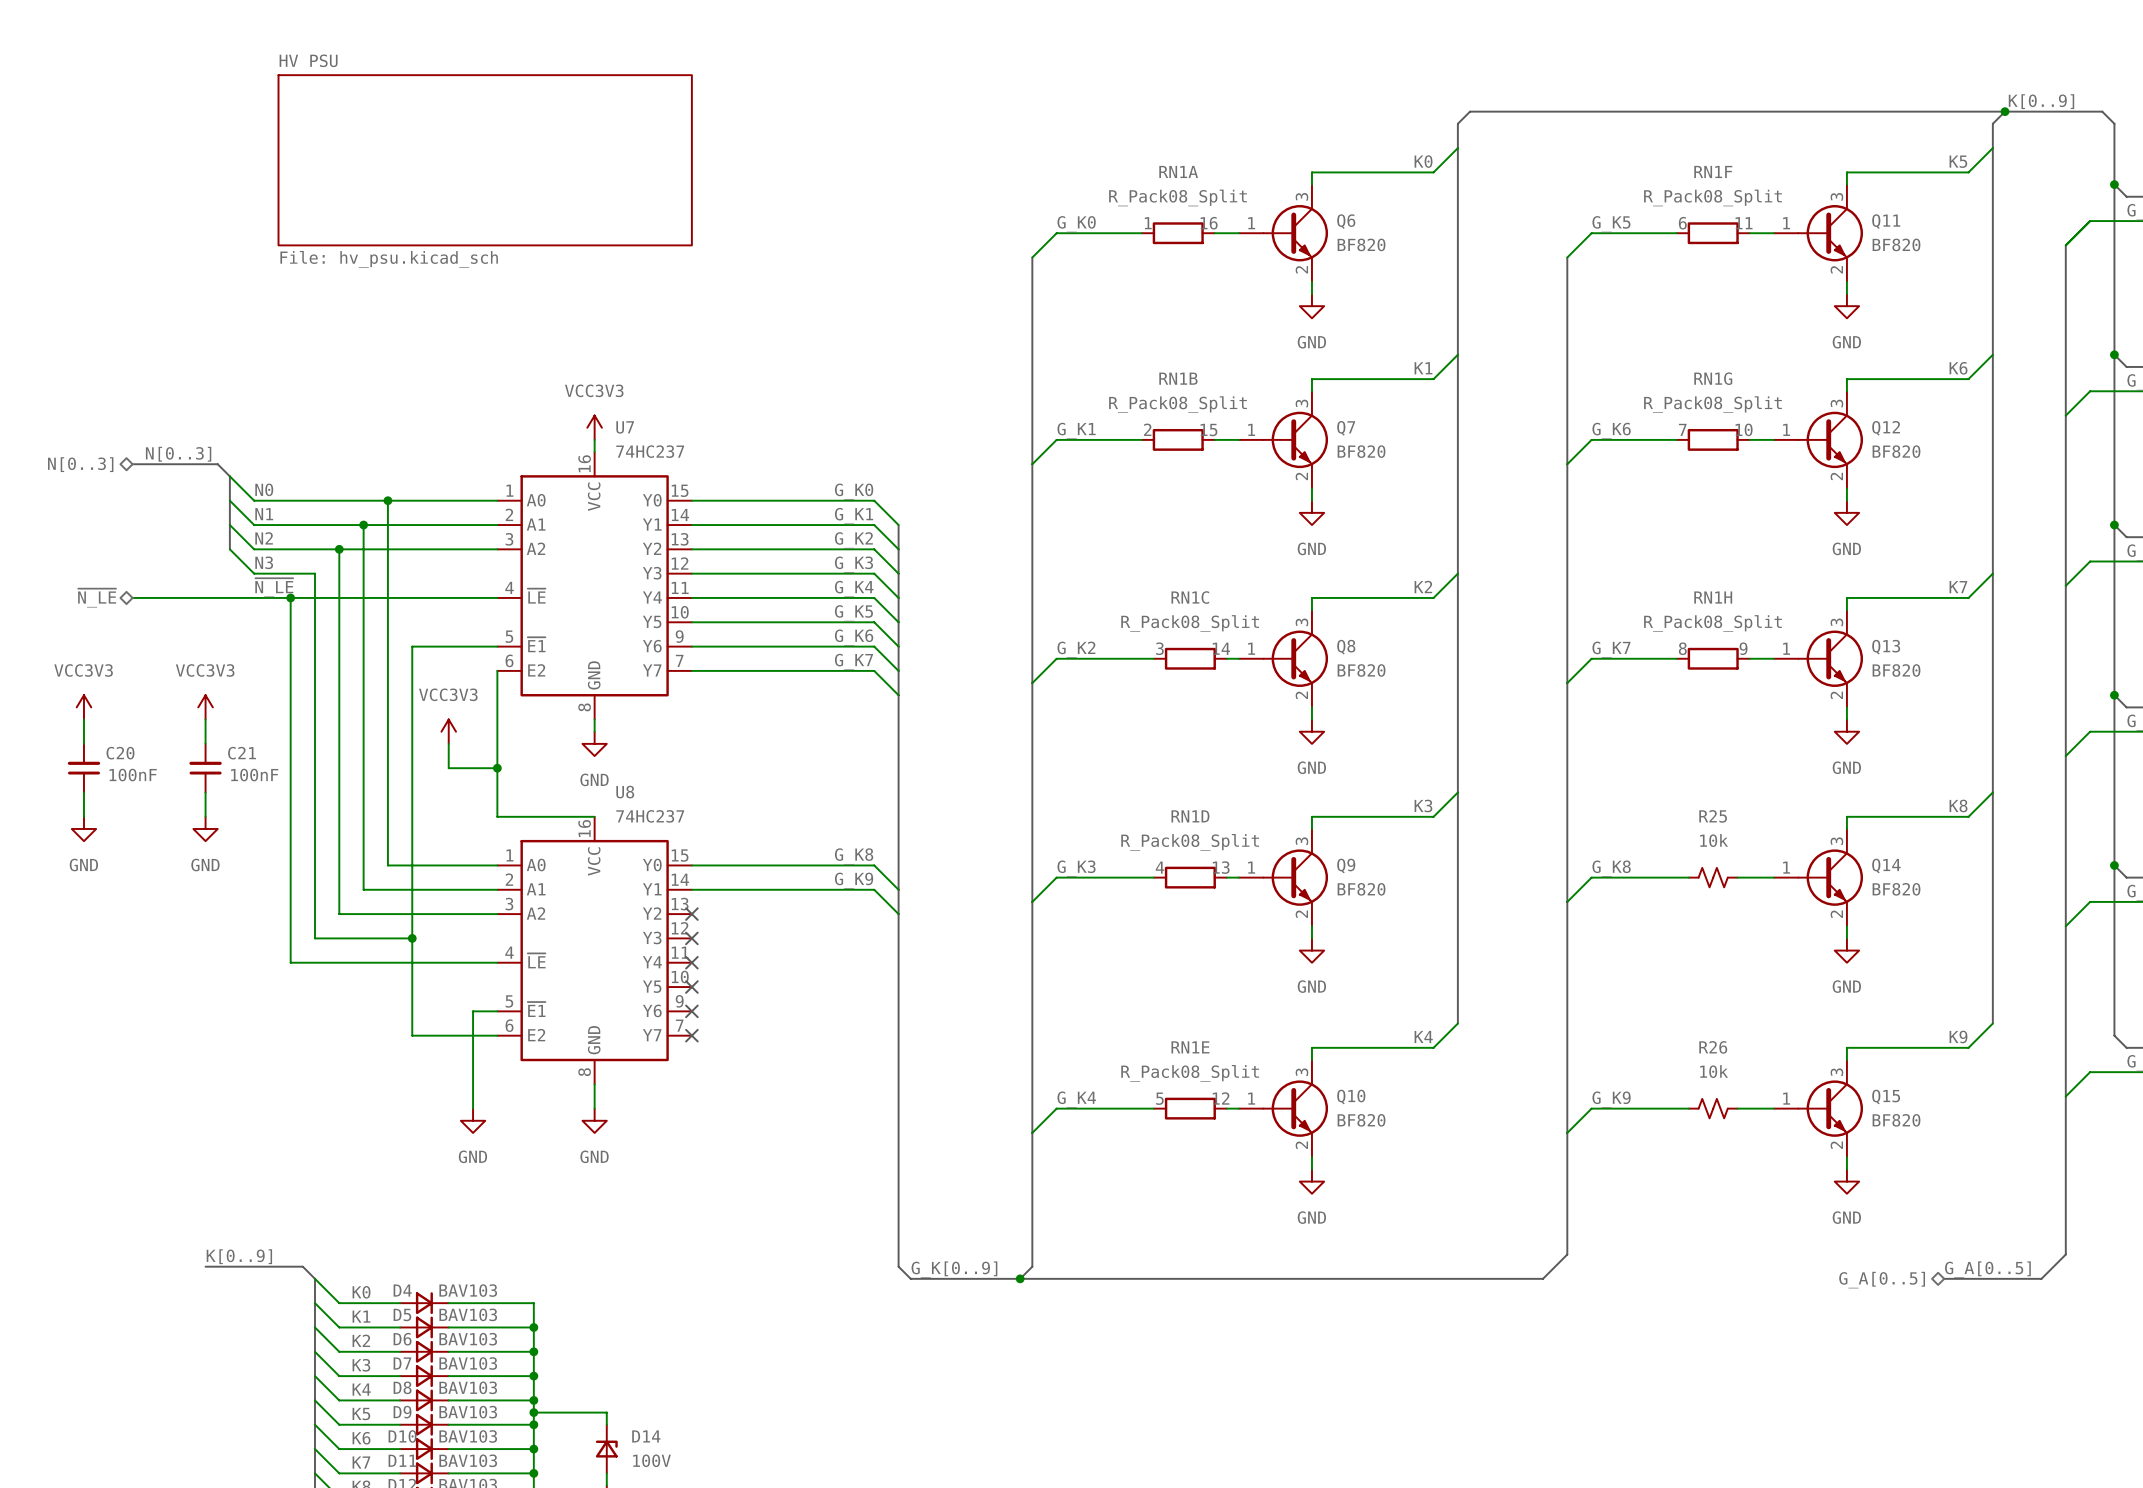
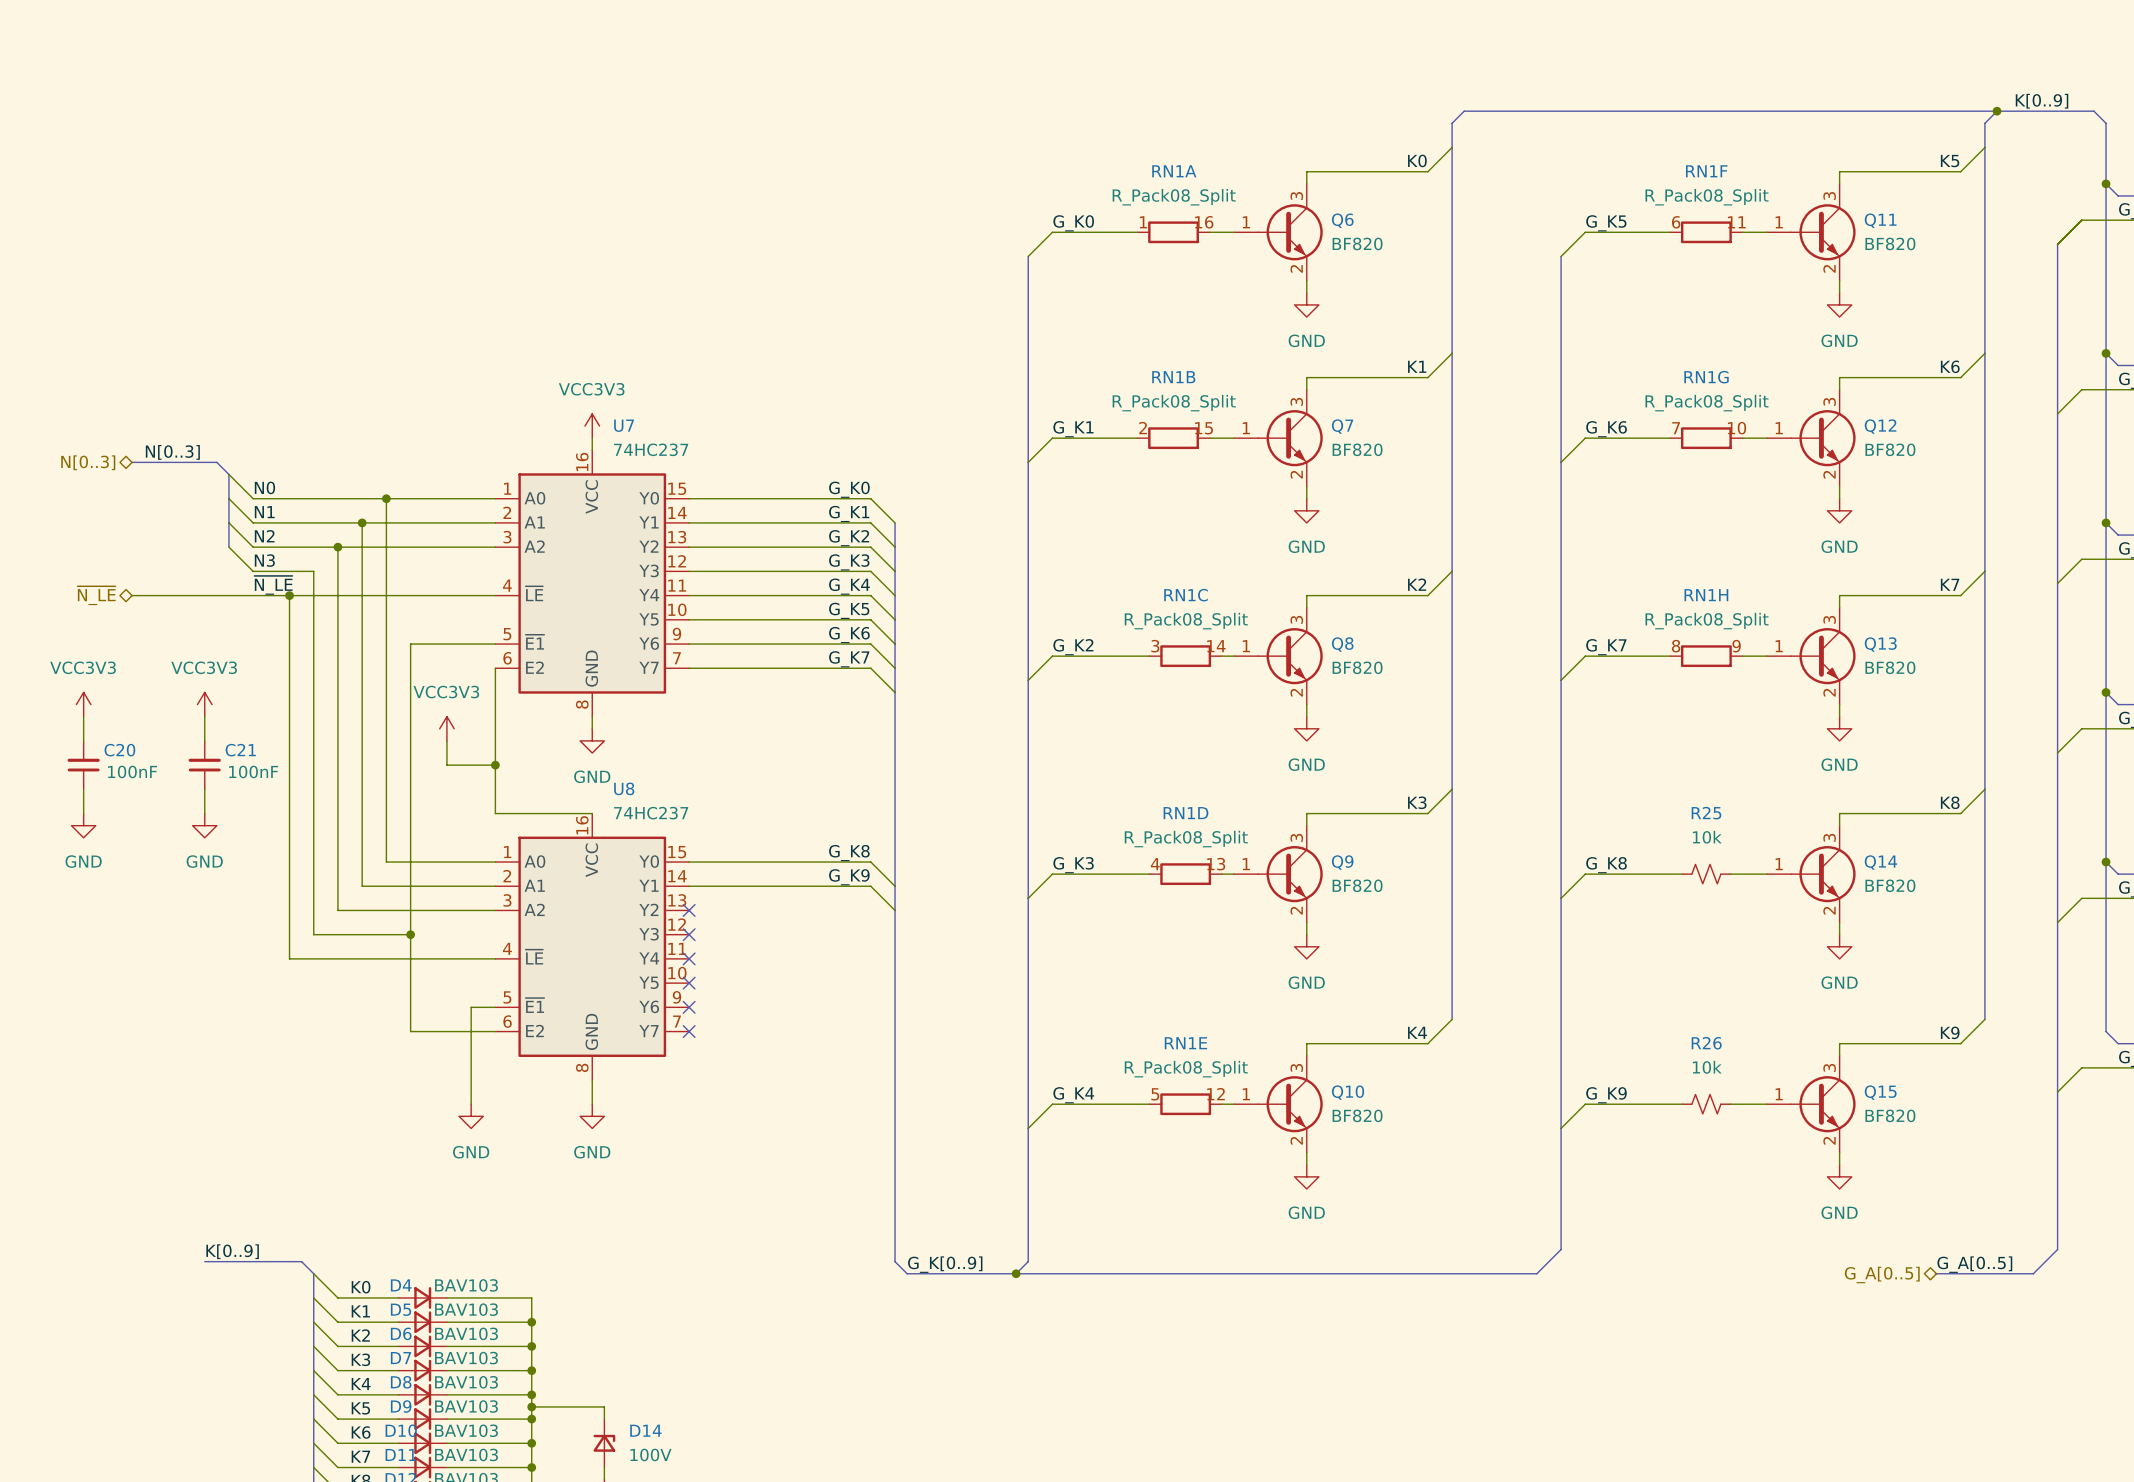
sheet HV PSU: File: hv_psu.kicad_sch (485, 160) -> none

